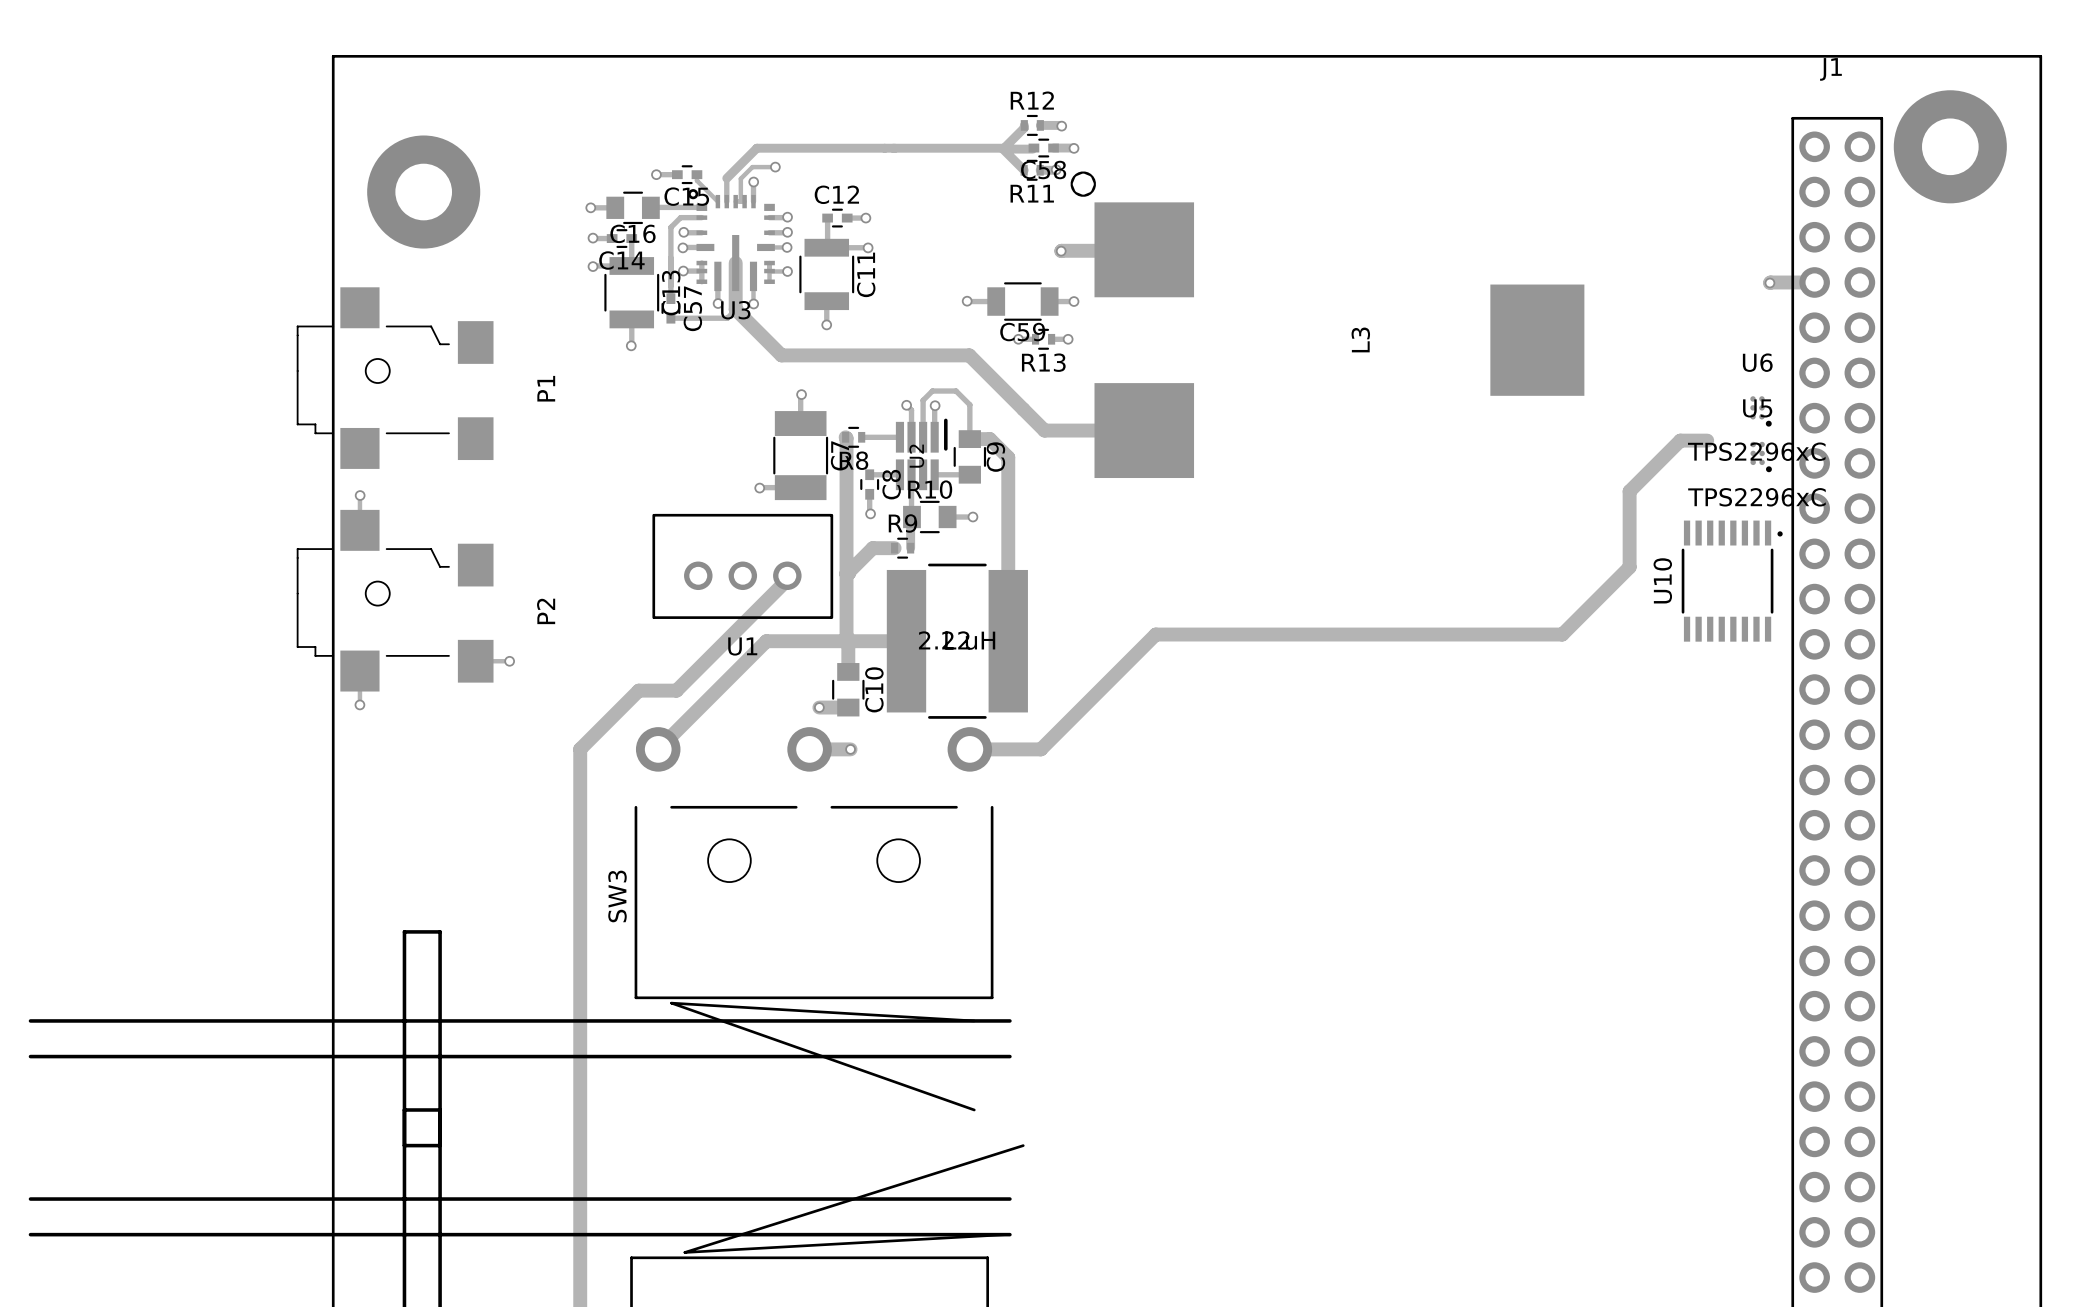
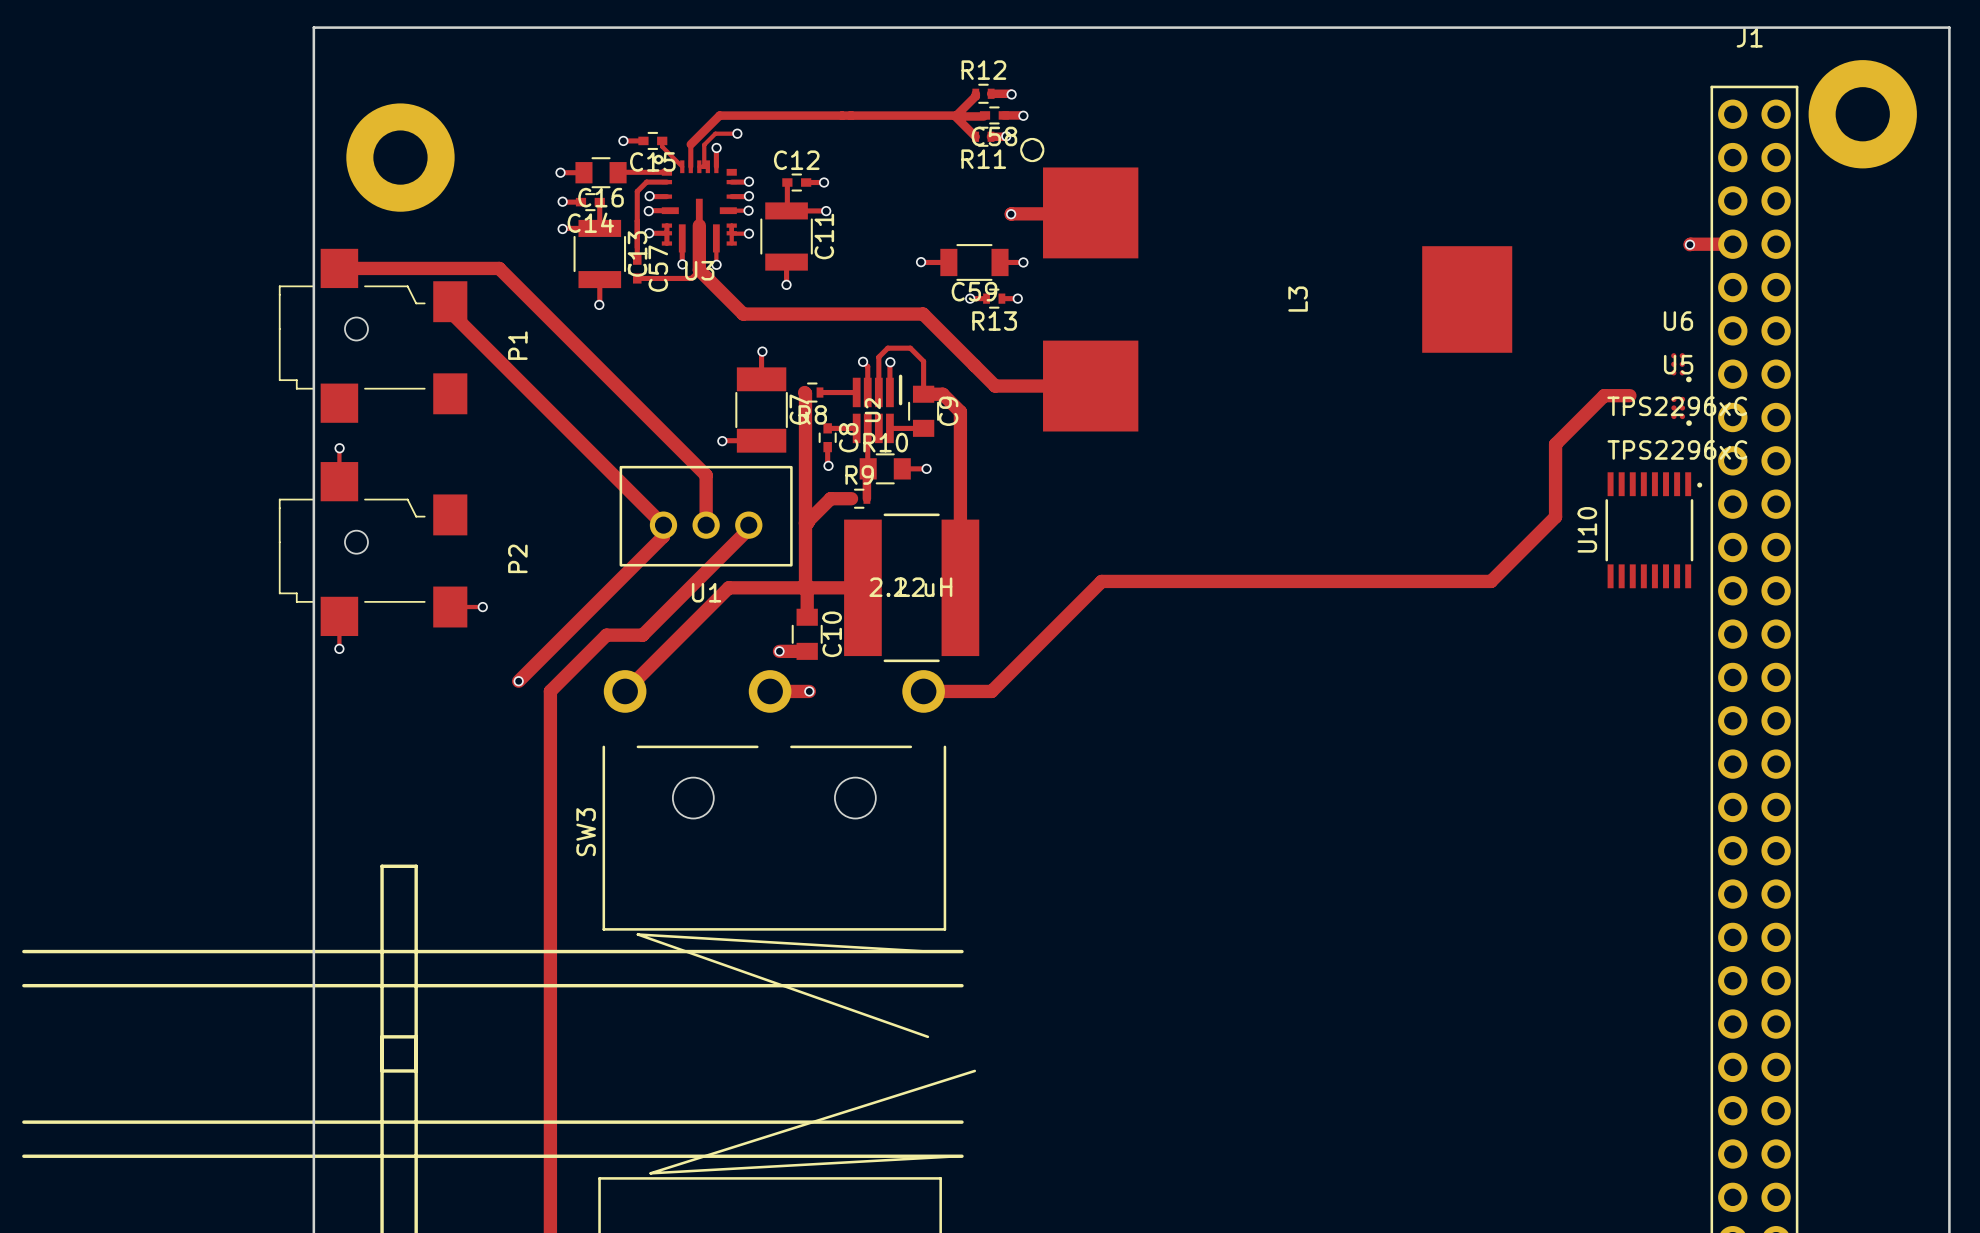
track: none -> (339, 268) (499, 268) (706, 475) (706, 525)
track: none -> (450, 311) (663, 525) (663, 536) (518, 681)
via: none -> (518, 681)

